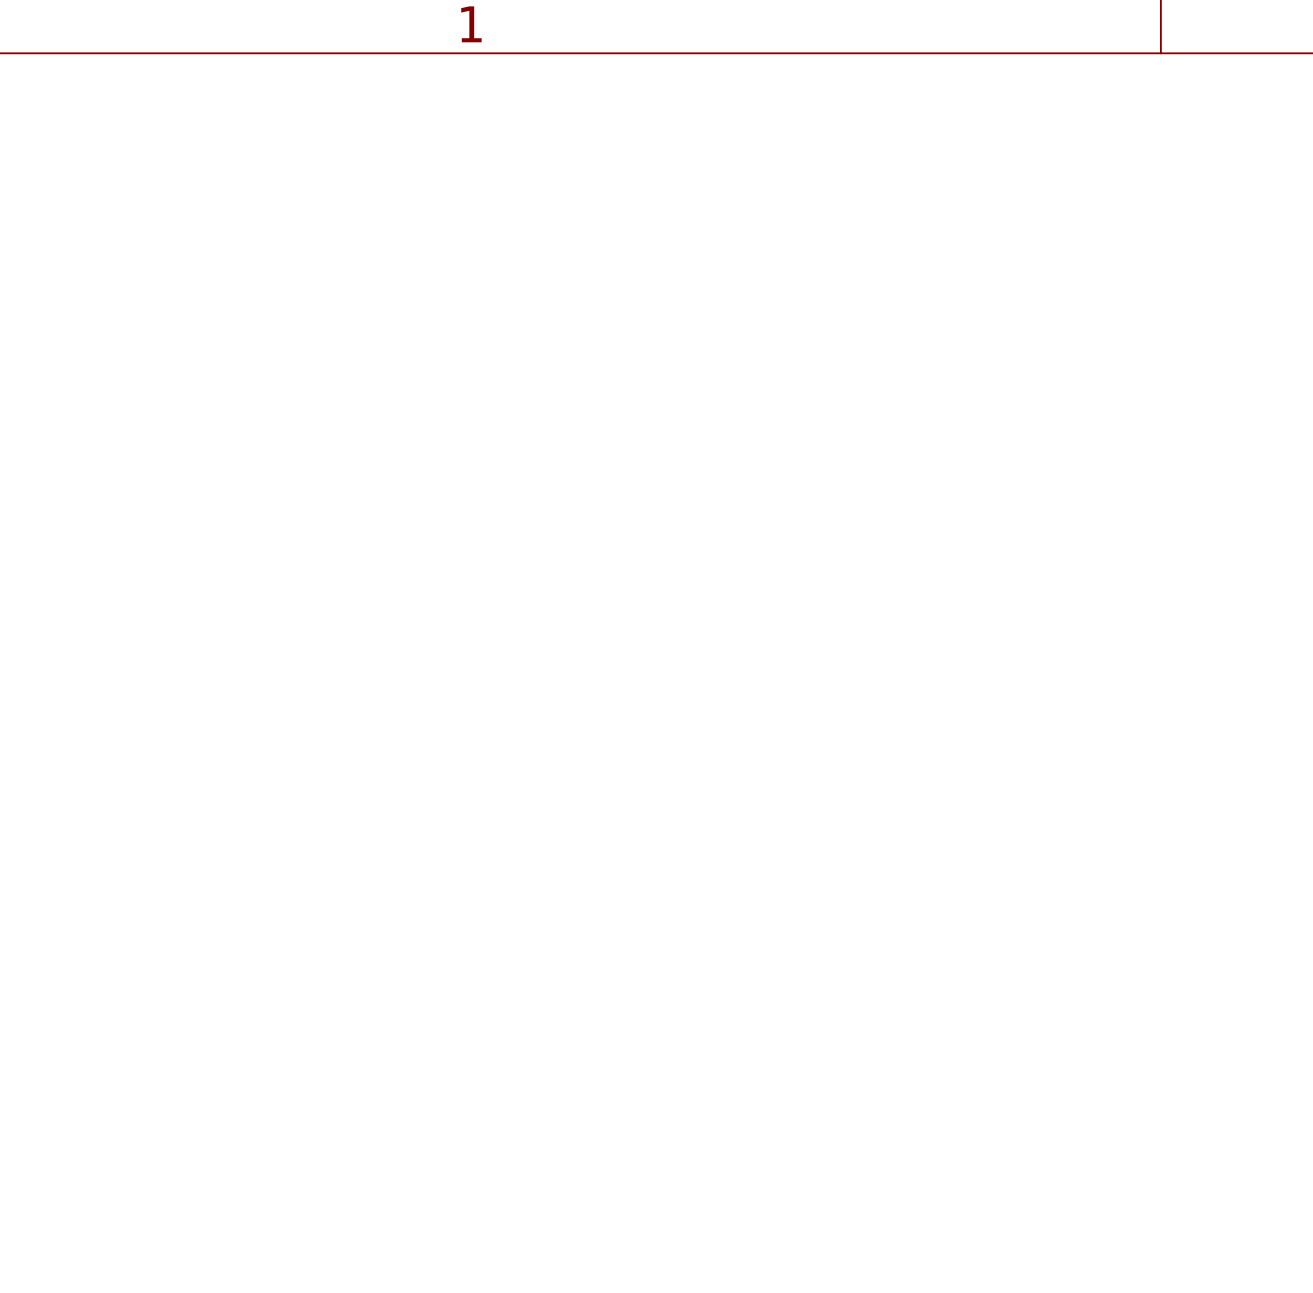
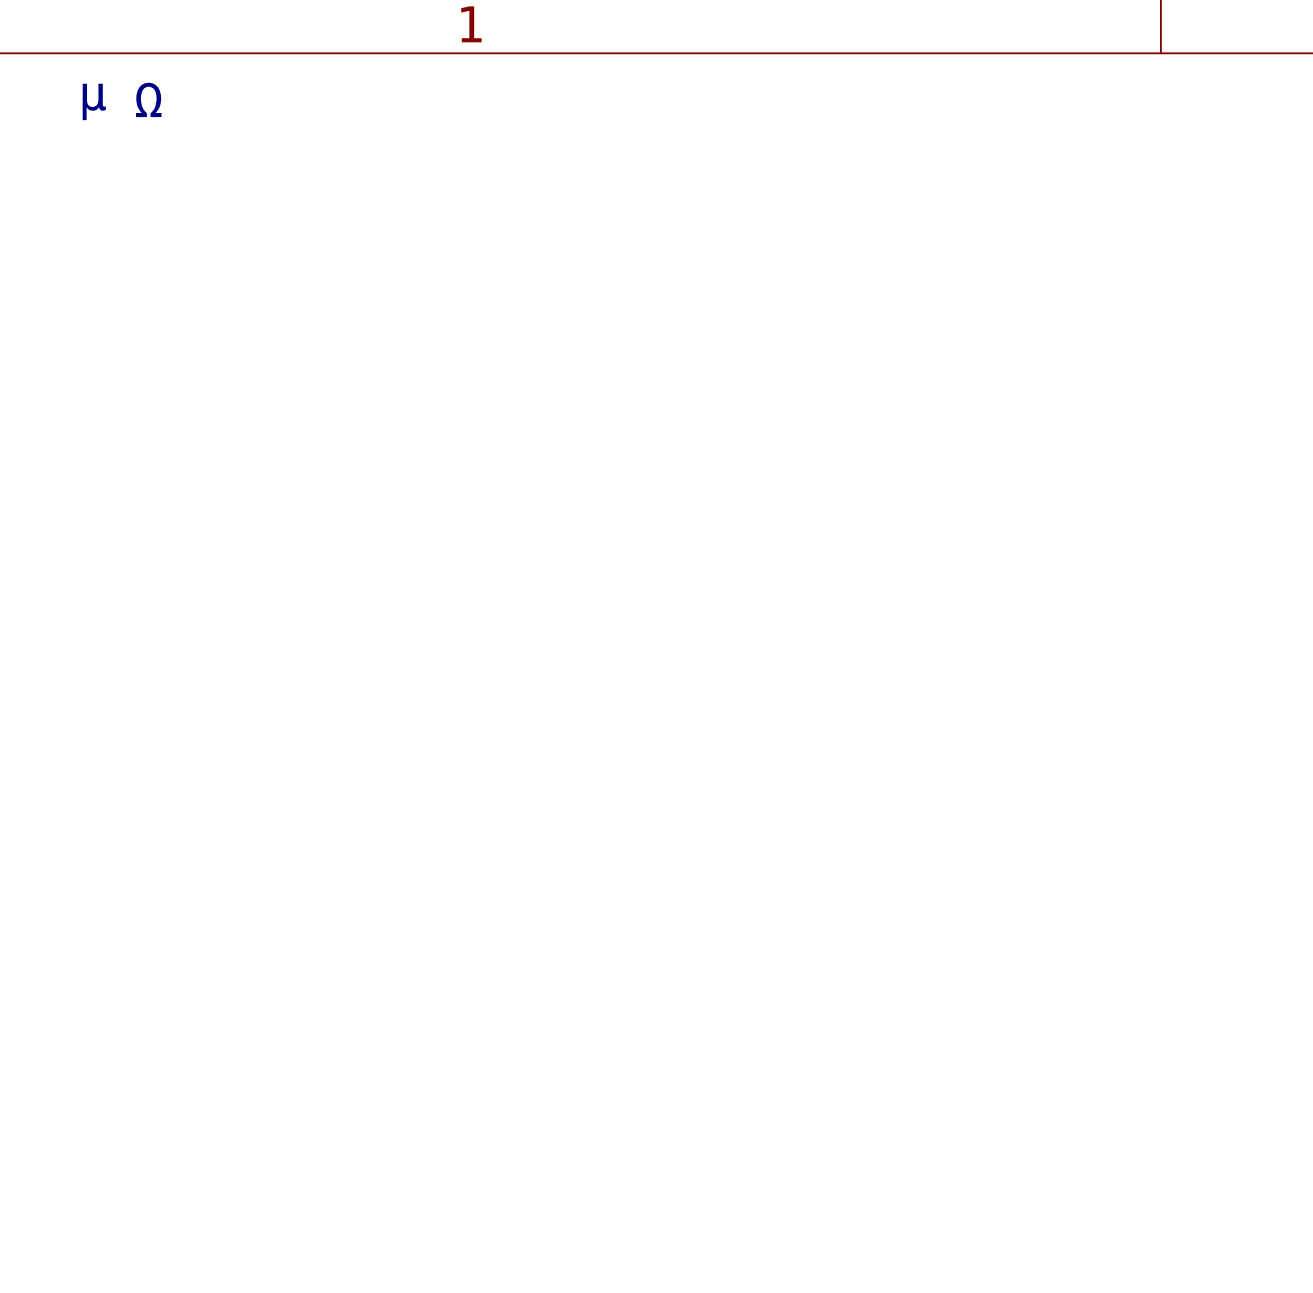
text: none -> Ω (148, 99)
text: none -> μ (94, 101)

